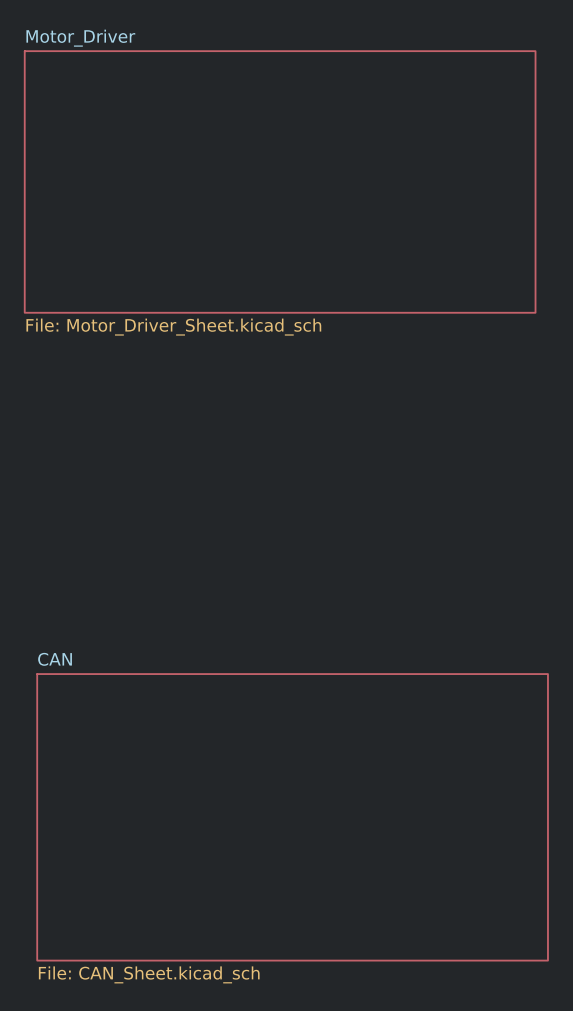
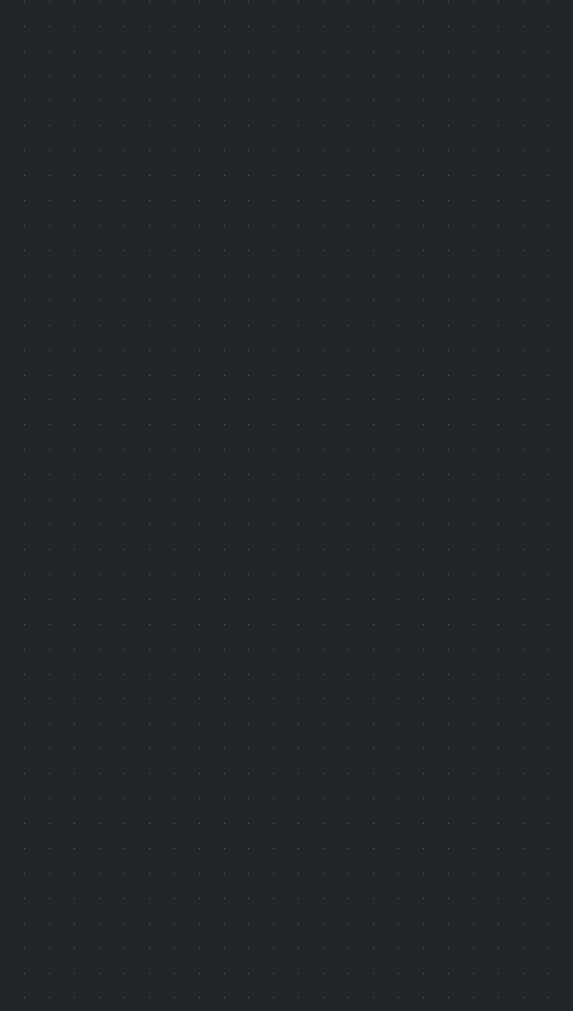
sheet Motor_Driver: File: Motor_Driver_Sheet.kicad_sch (280, 181) -> none
sheet CAN: File: CAN_Sheet.kicad_sch (292, 817) -> none

